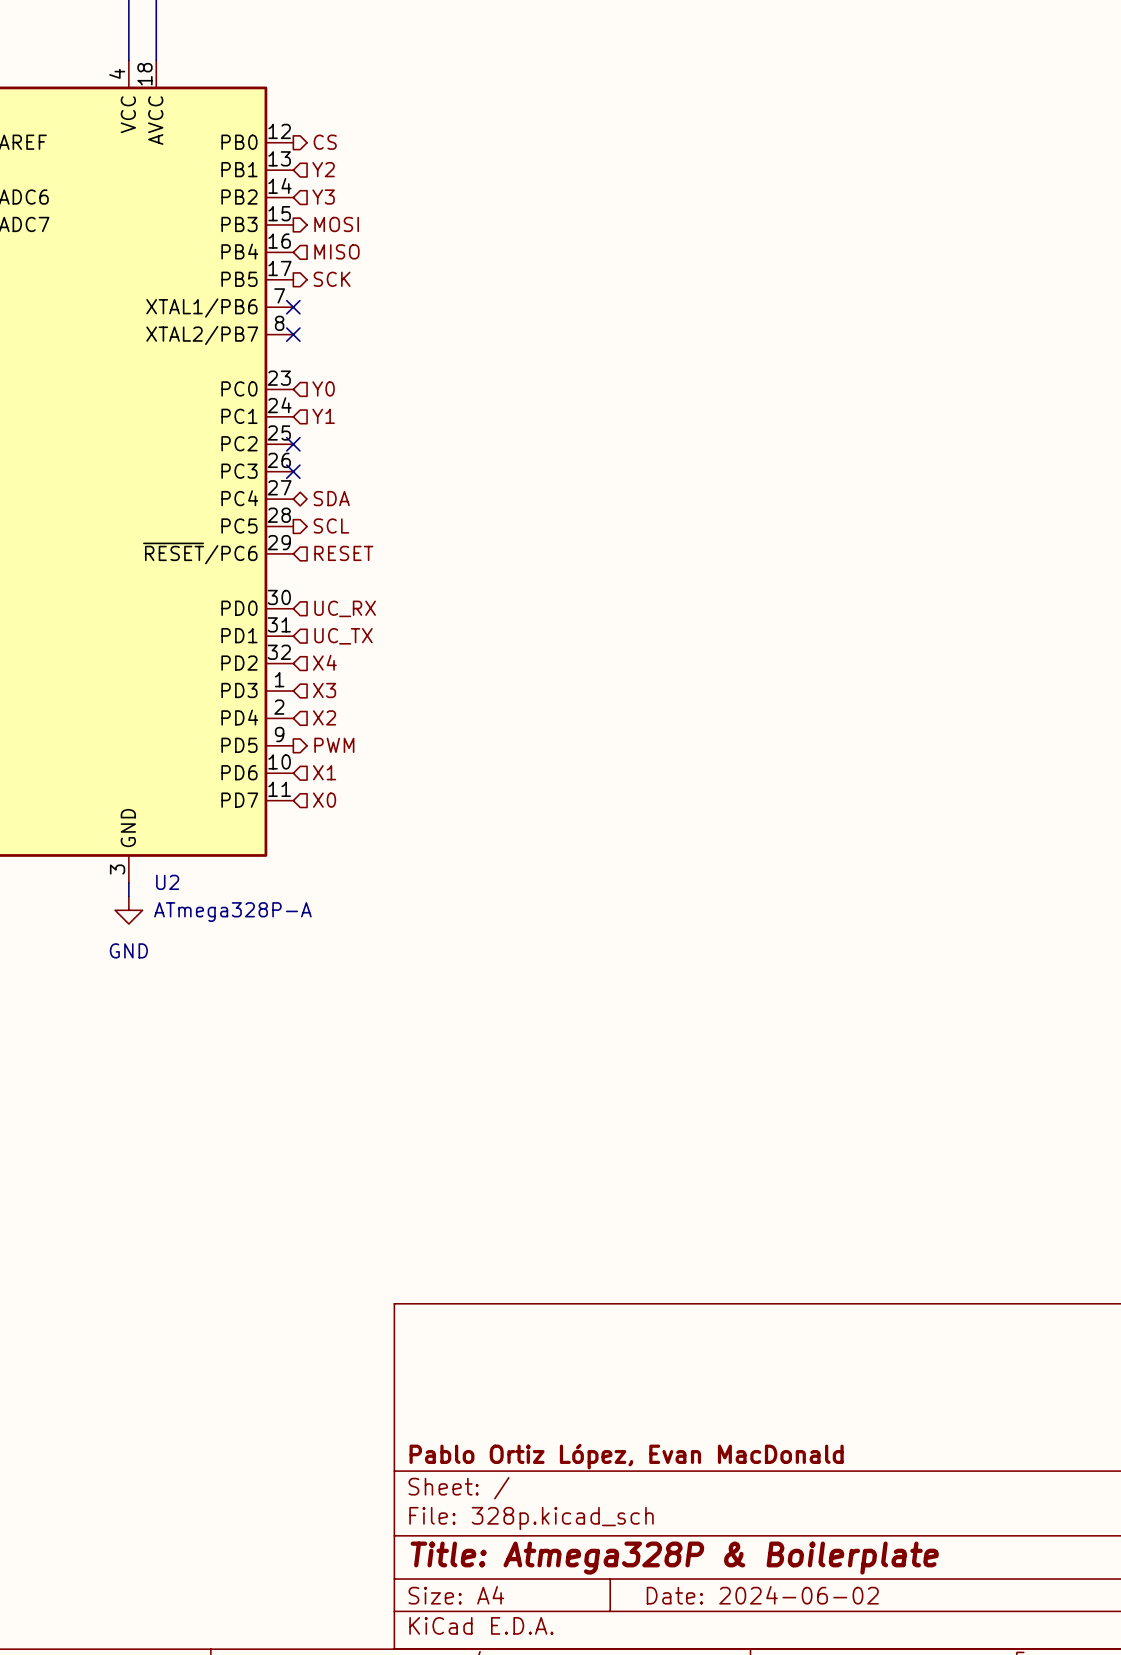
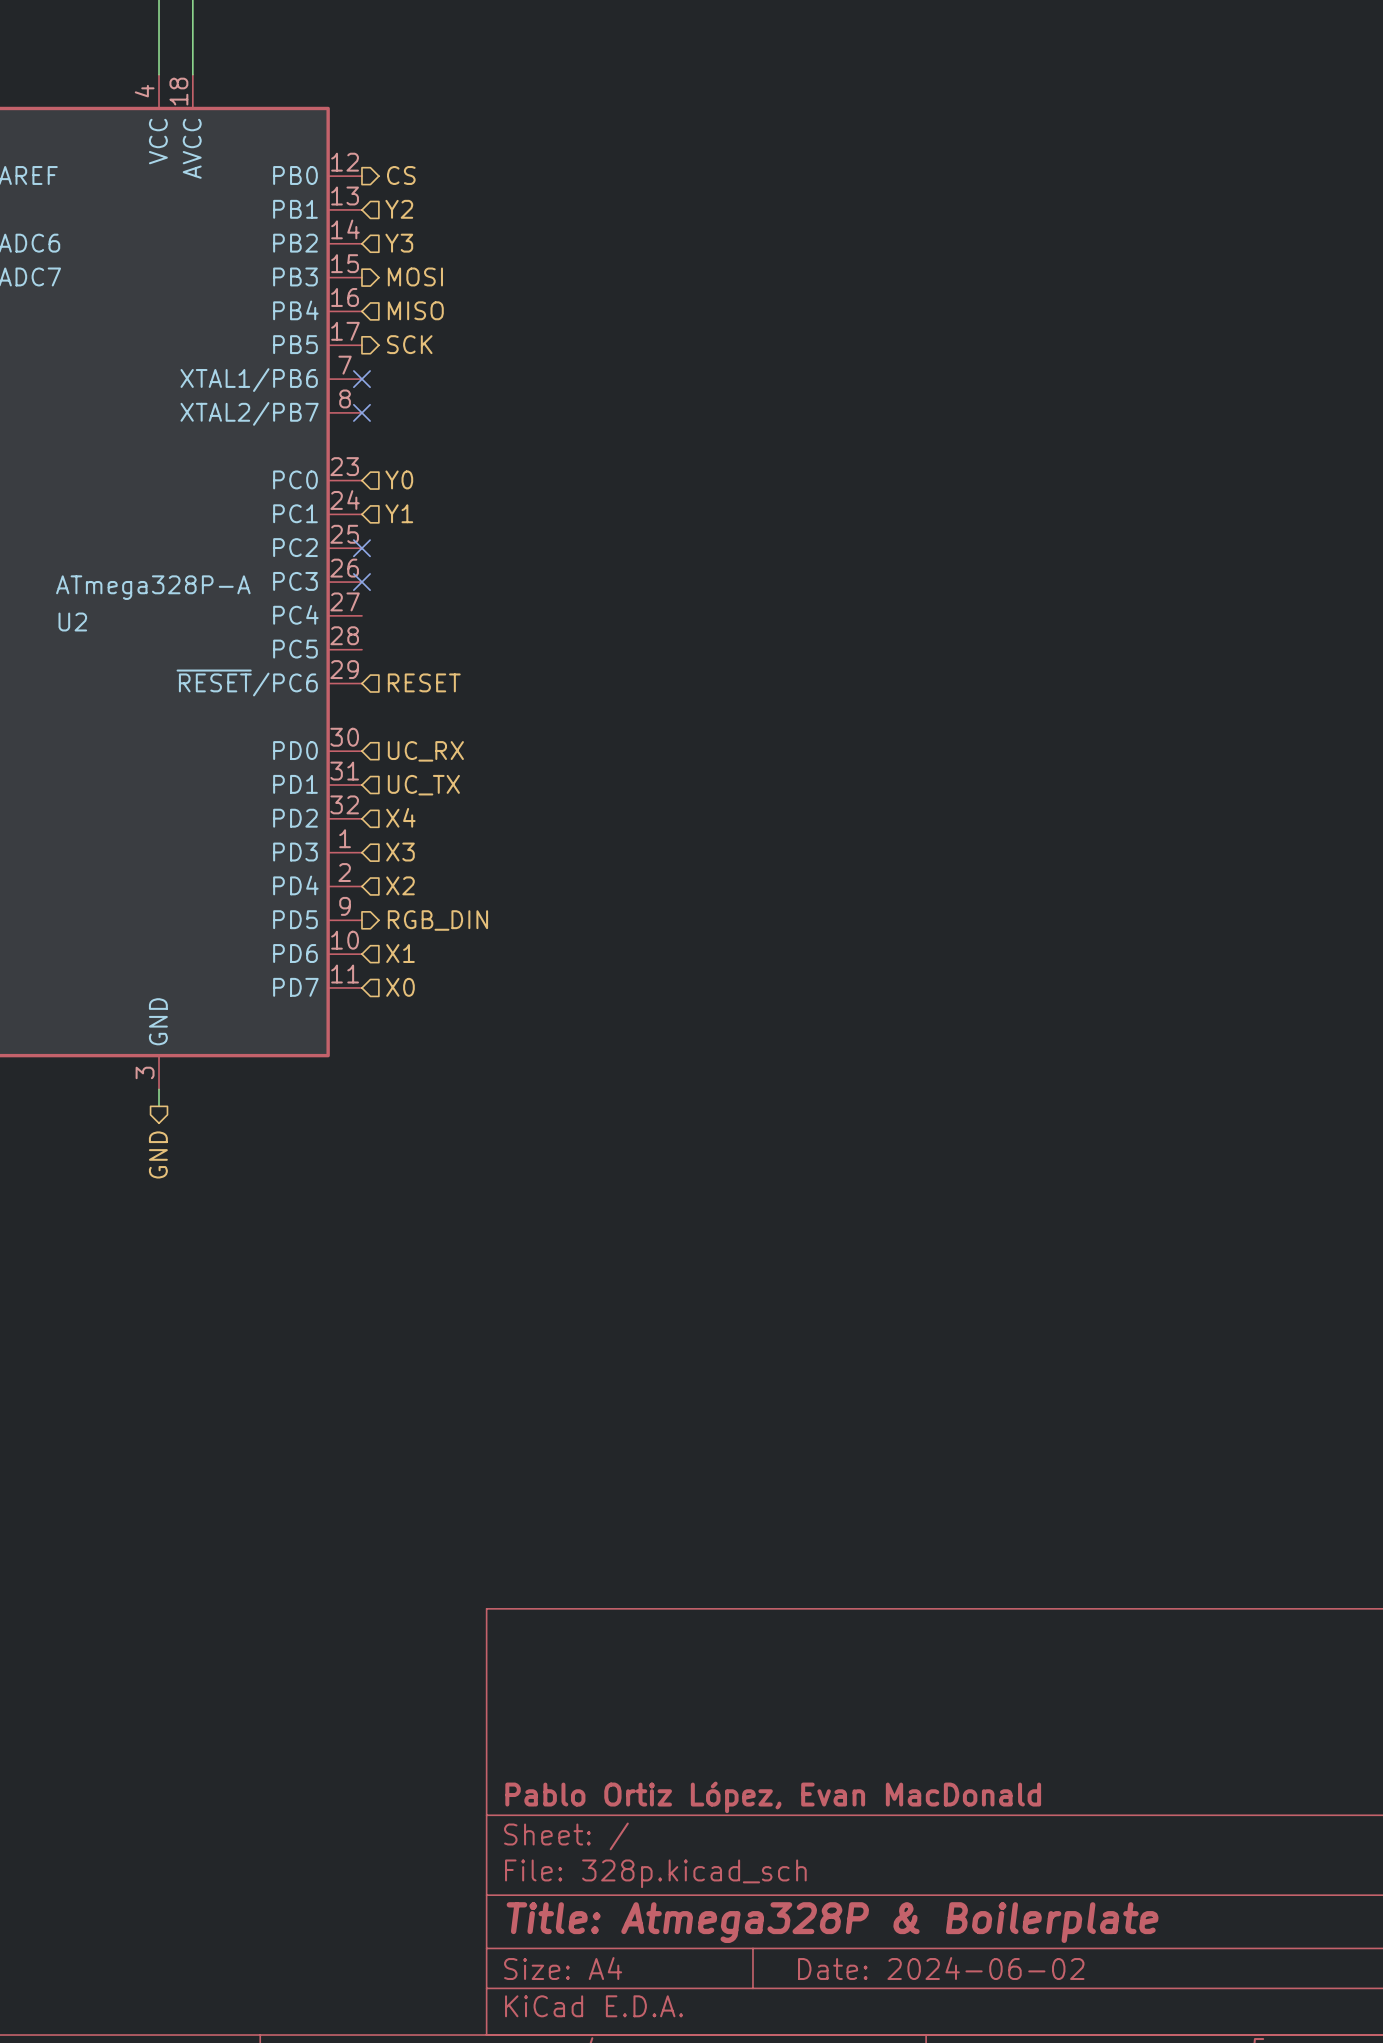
hierarchical label: SDA (331, 498) -> none
hierarchical label: SCL (331, 526) -> none
hierarchical label: PWM (334, 745) -> RGB_DIN (437, 920)
U2 name position: U2 (167, 882) -> U2 (72, 622)
power symbol: GND (128, 910) -> none
U2 value position: ATmega328P-A (232, 912) -> ATmega328P-A (153, 587)
hierarchical label: none -> GND (158, 1154)

